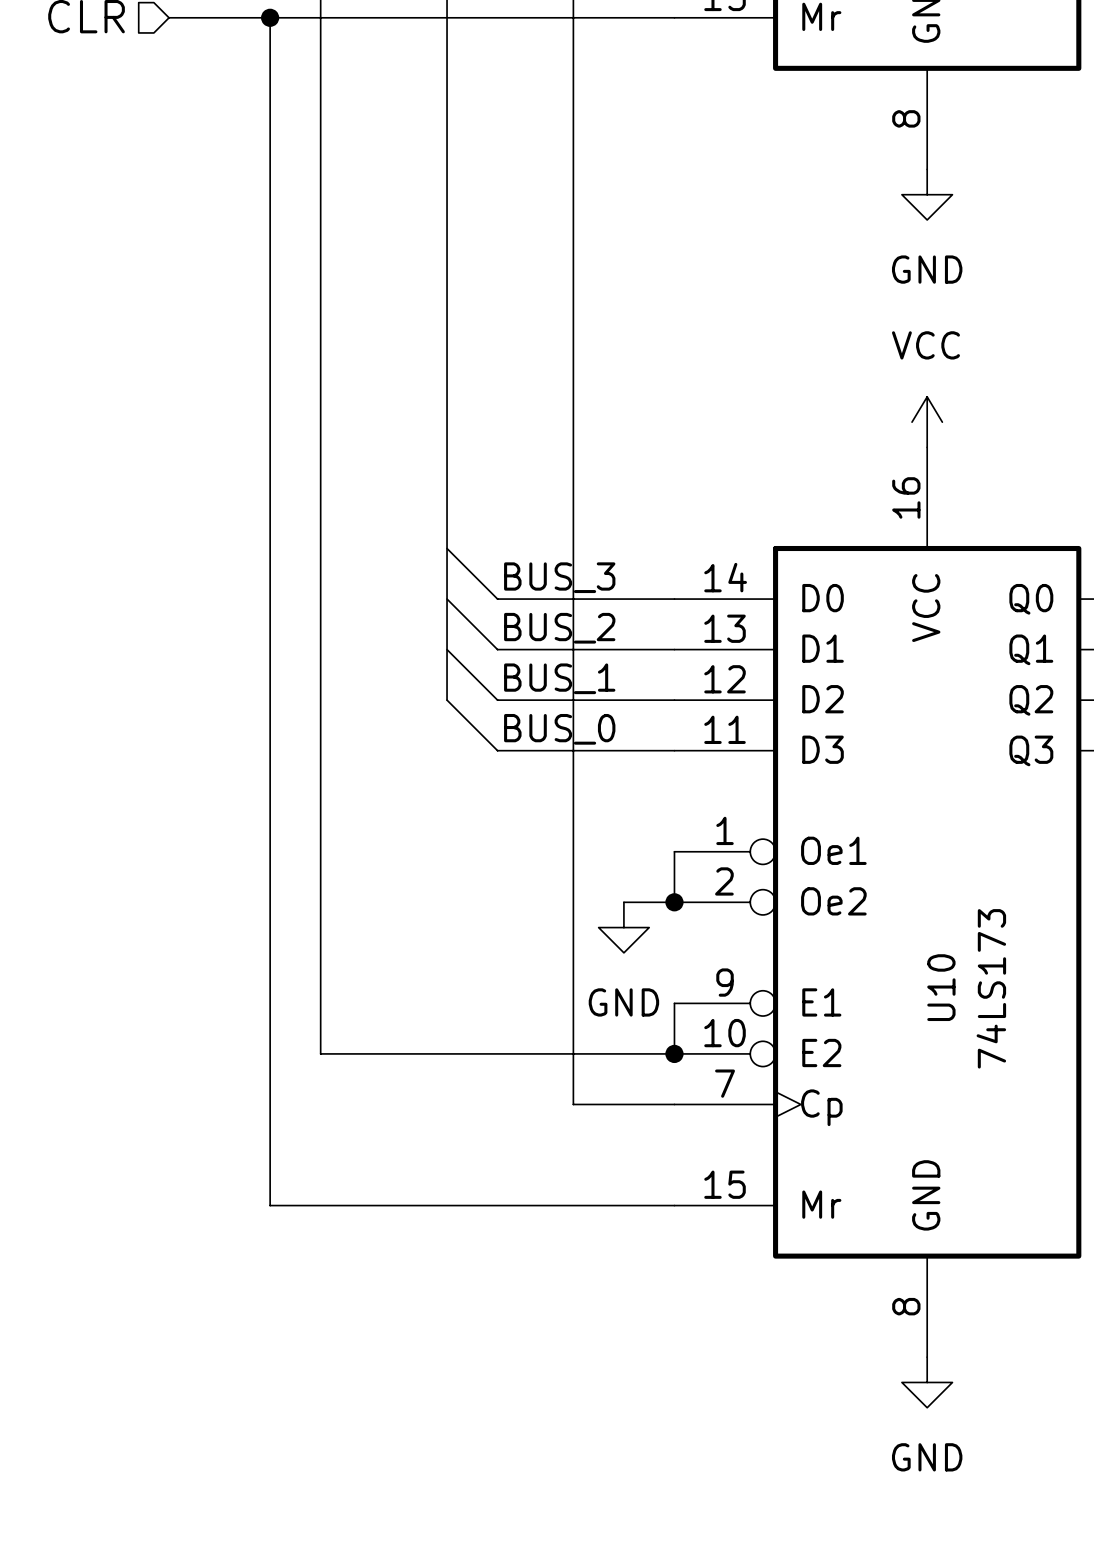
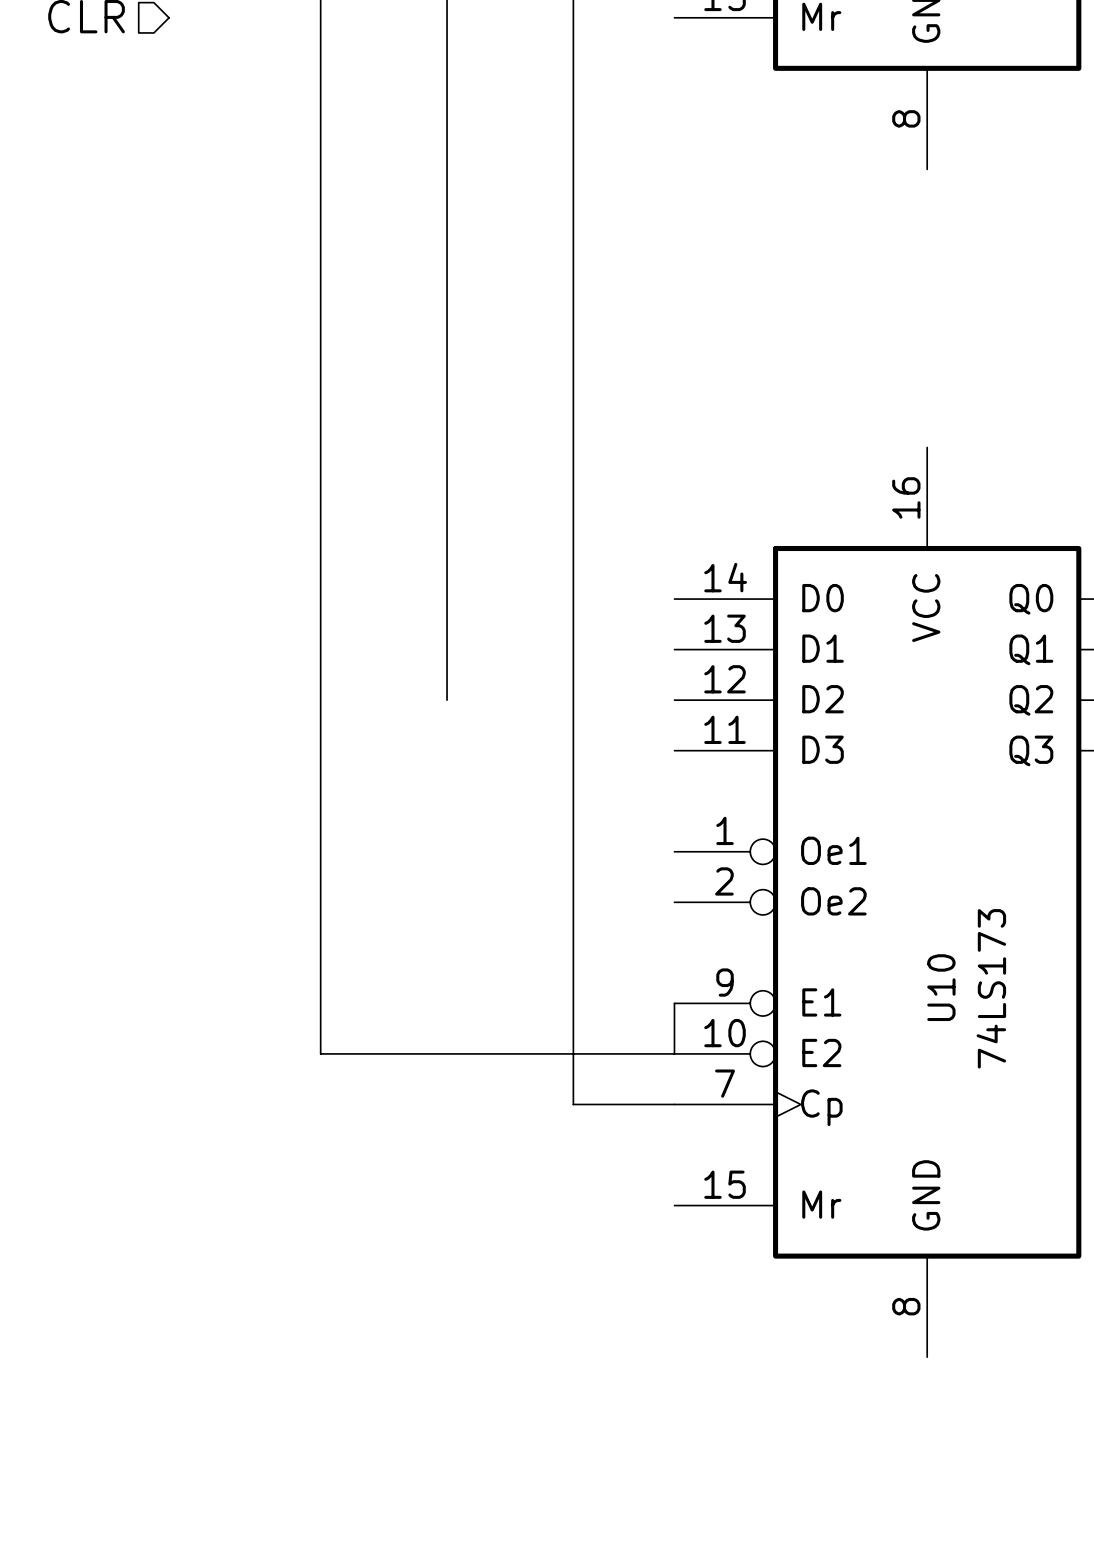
wire: (169, 17) (674, 17) -> none
wire: (270, 17) (270, 1205) (674, 1205) -> none
junction: (270, 17) -> none
power symbol: GND (927, 194) -> none
power symbol: VCC (927, 422) -> none
wire: (447, 548) (497, 599) (674, 599) -> none
label: BUS_3 (559, 577) -> none
wire: (447, 599) (497, 649) (674, 649) -> none
label: BUS_2 (559, 628) -> none
wire: (447, 649) (497, 700) (674, 700) -> none
label: BUS_1 (559, 678) -> none
wire: (447, 700) (497, 750) (674, 750) -> none
label: BUS_0 (559, 729) -> none
wire: (674, 851) (674, 902) (623, 902) -> none
junction: (674, 902) -> none
power symbol: GND (623, 927) -> none
junction: (674, 1053) -> none
power symbol: GND (927, 1382) -> none

